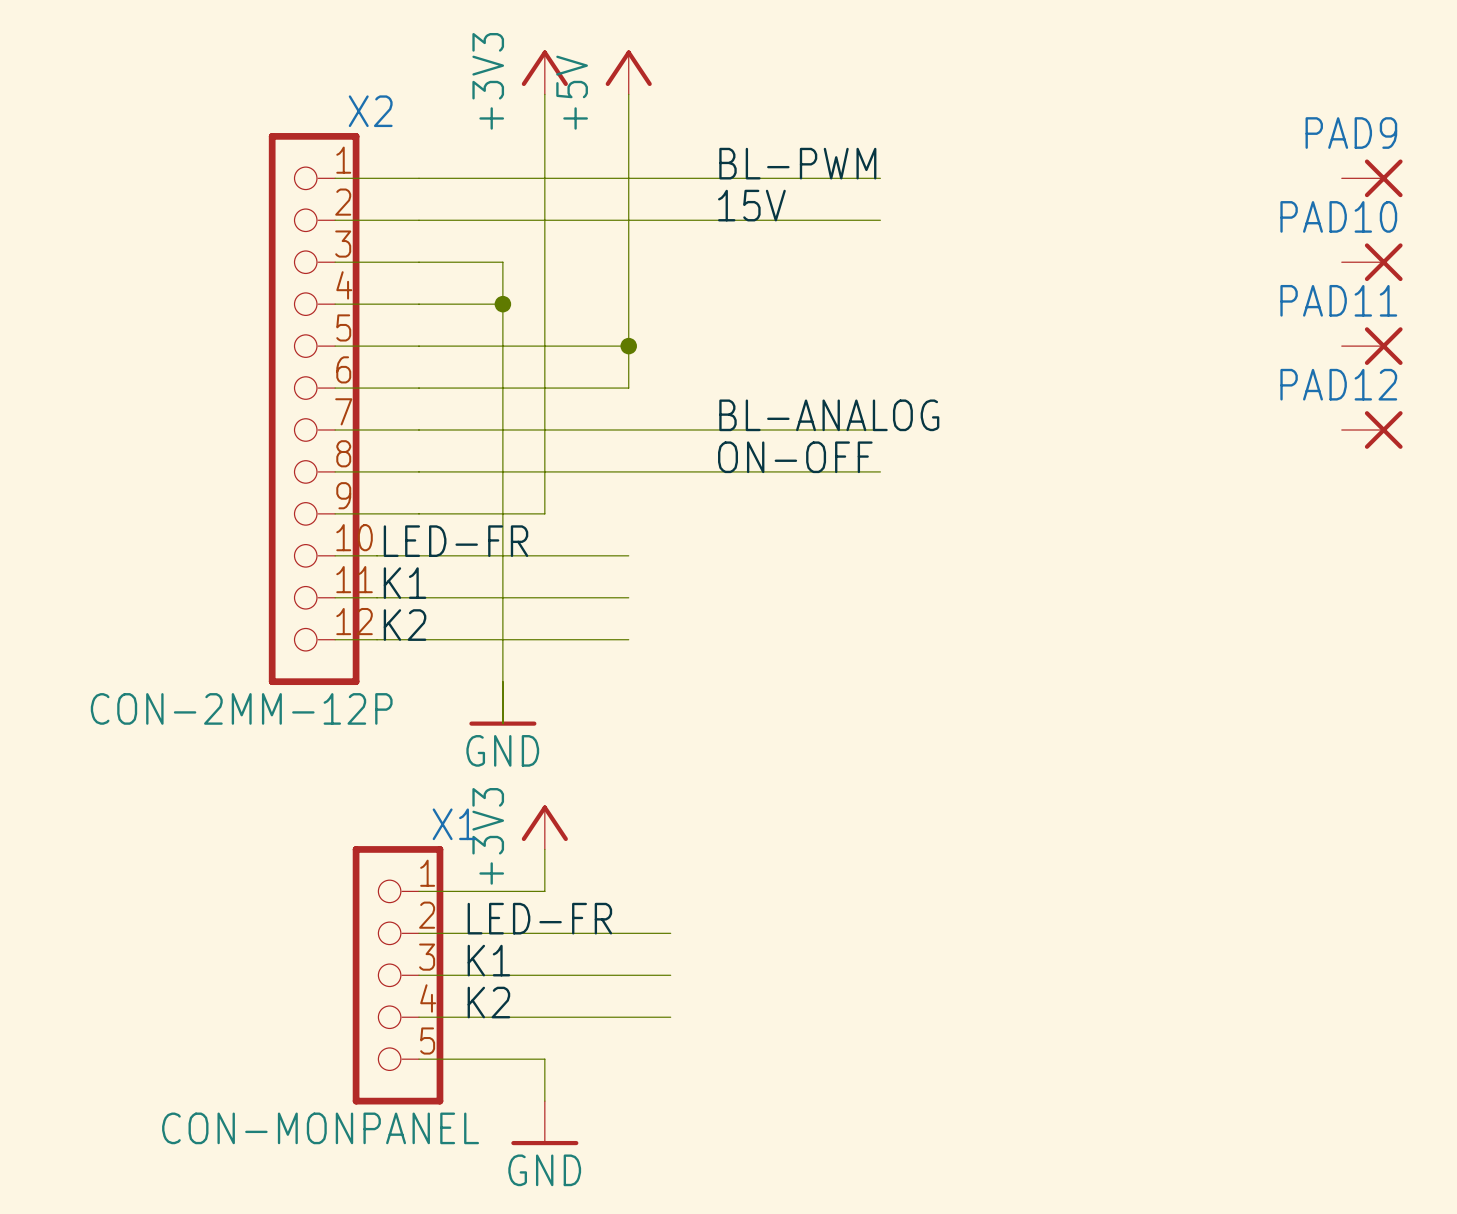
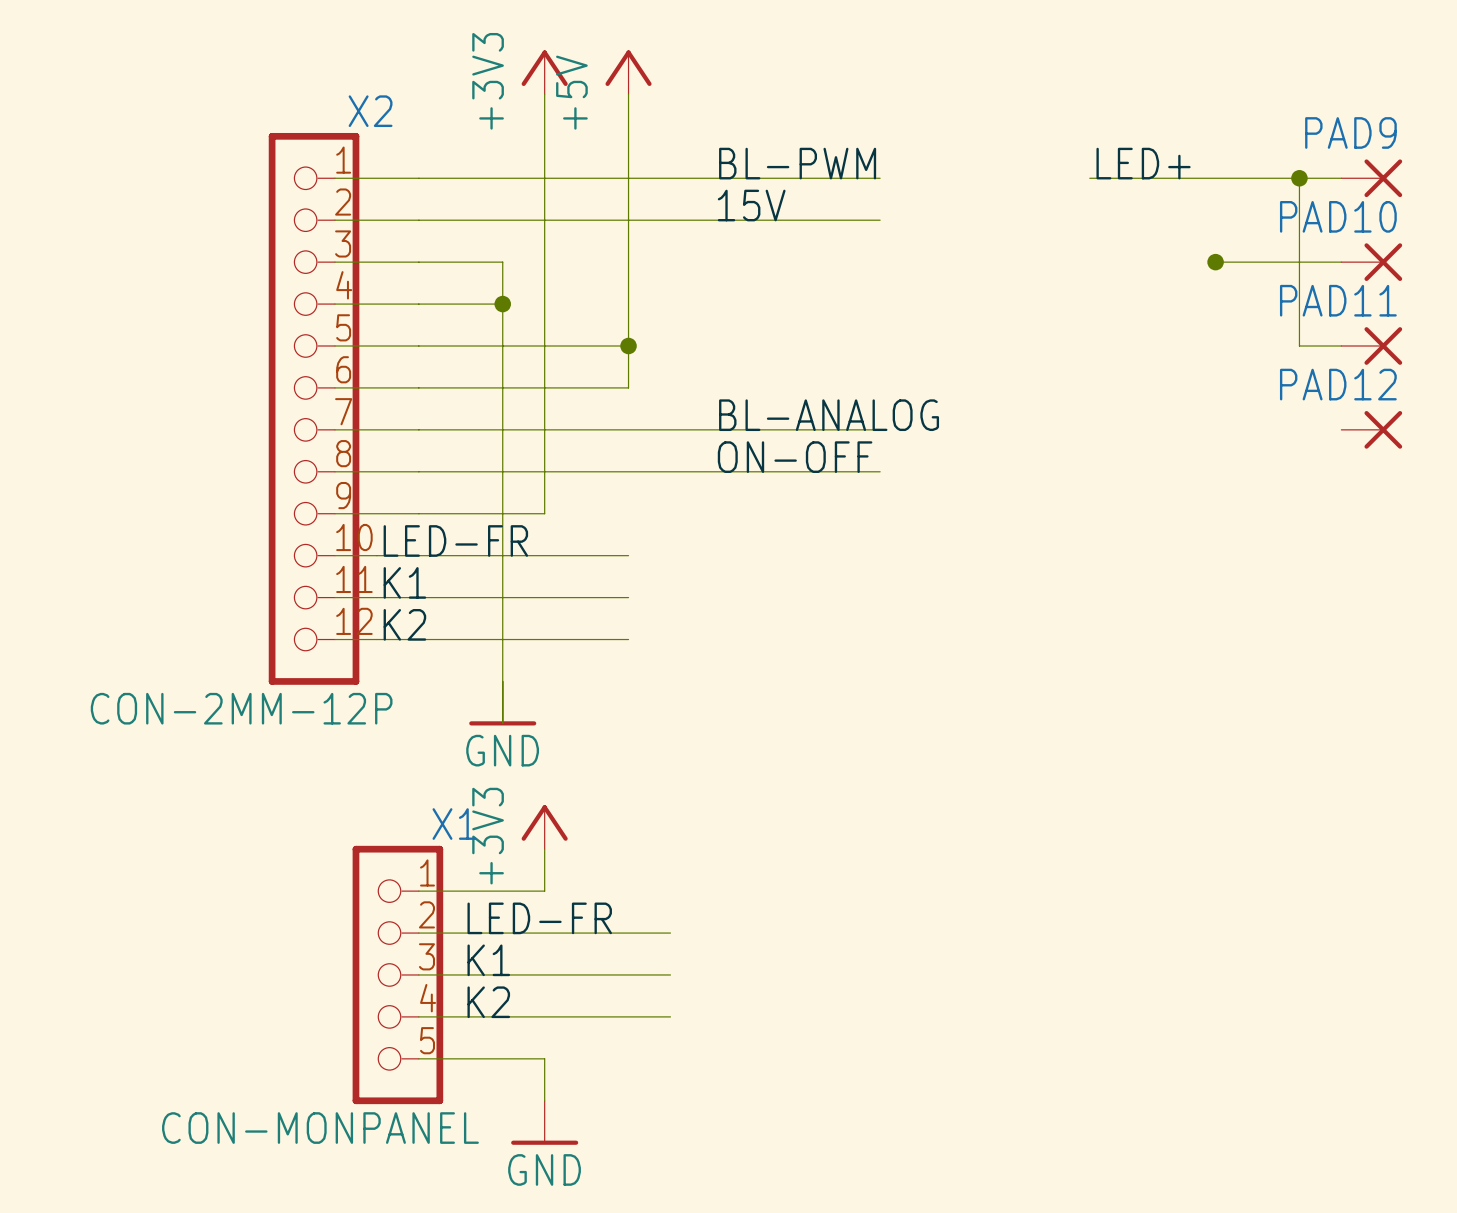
label: none -> LED+ (1143, 163)
wire: none -> (1089, 178) (1341, 178)
wire: none -> (1299, 178) (1299, 346) (1341, 346)
junction: none -> (1299, 178)
wire: none -> (1215, 262) (1341, 262)
junction: none -> (1215, 262)

